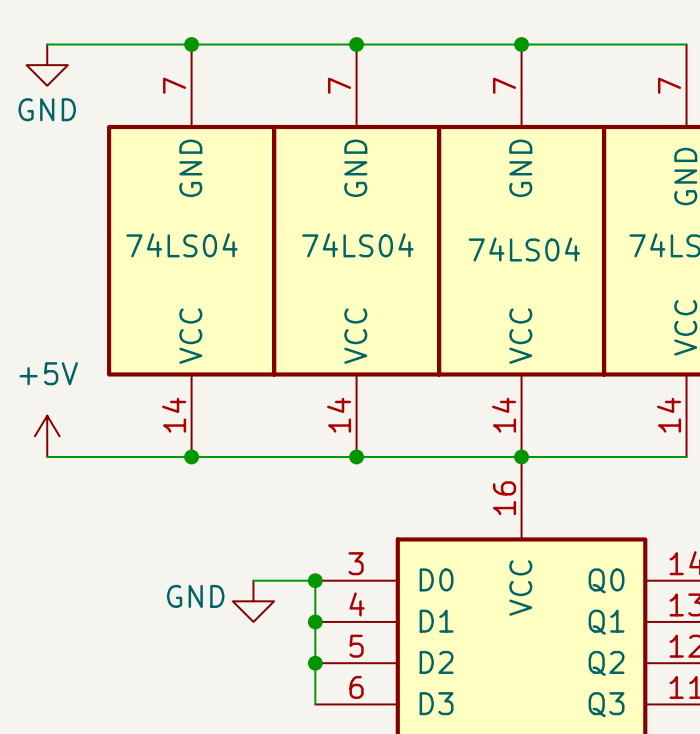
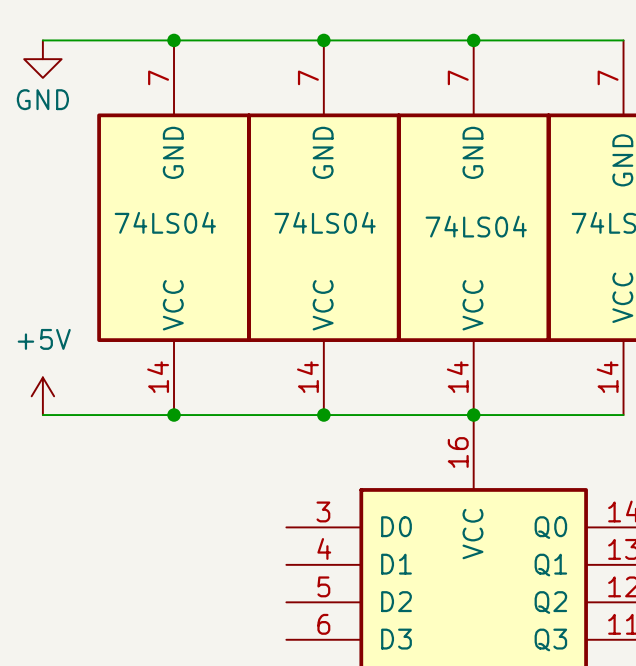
wire: (253, 580) (315, 580) (315, 704) -> none
junction: (315, 580) -> none
power symbol: GND (253, 601) -> none
junction: (315, 621) -> none
junction: (315, 663) -> none

